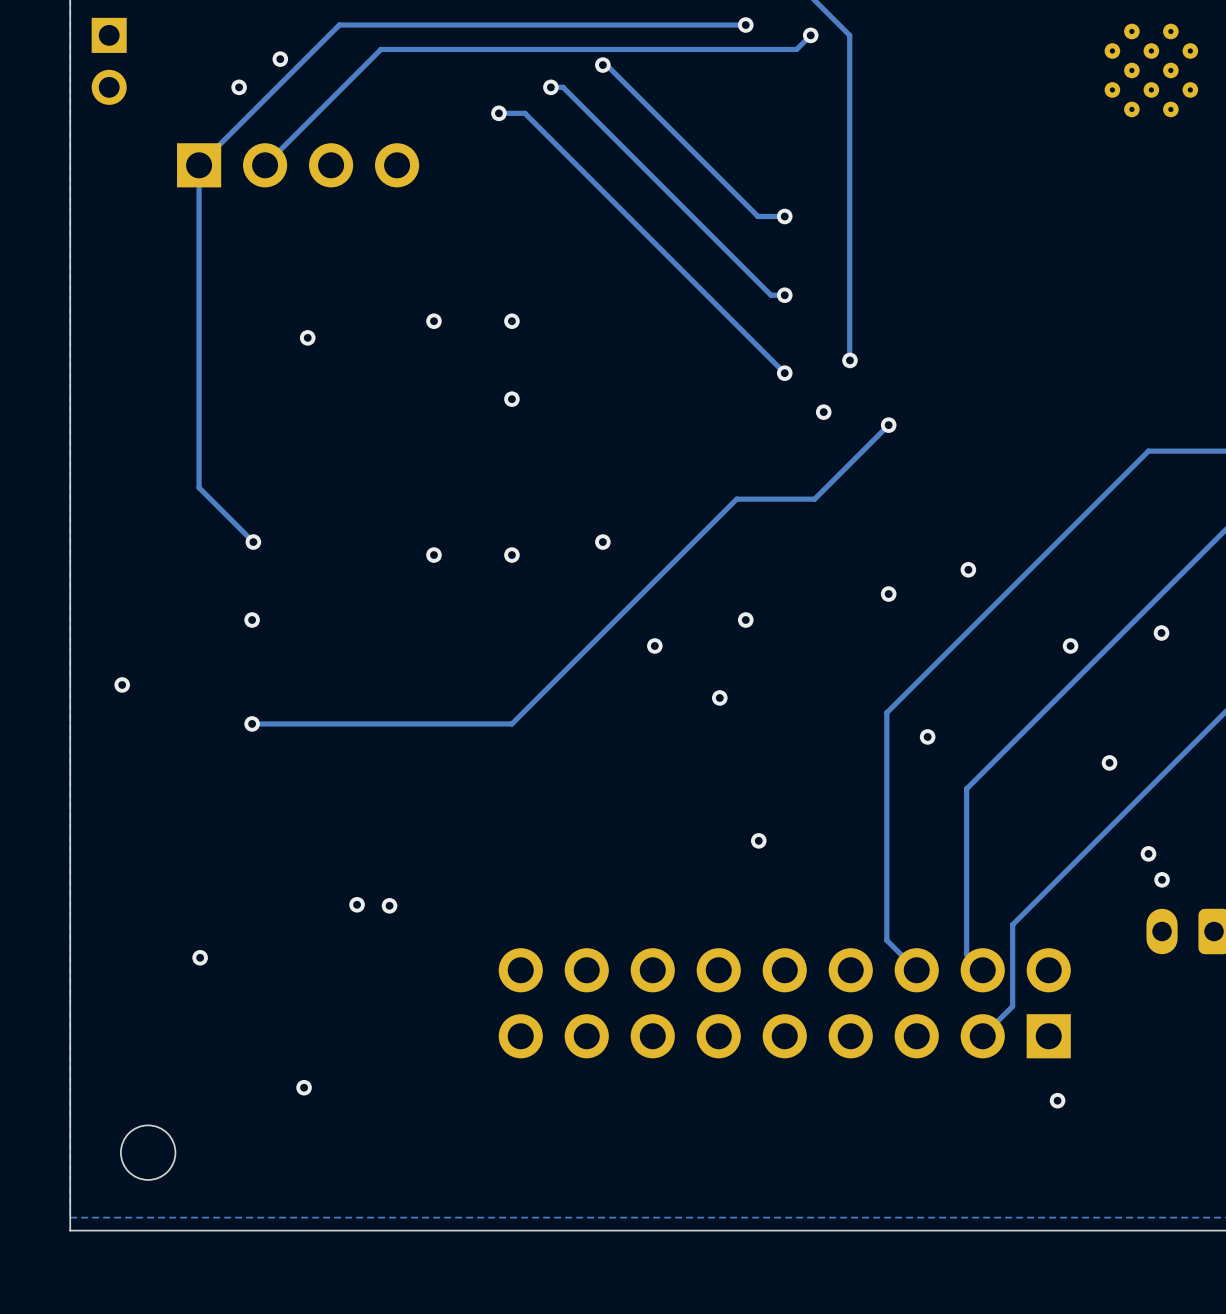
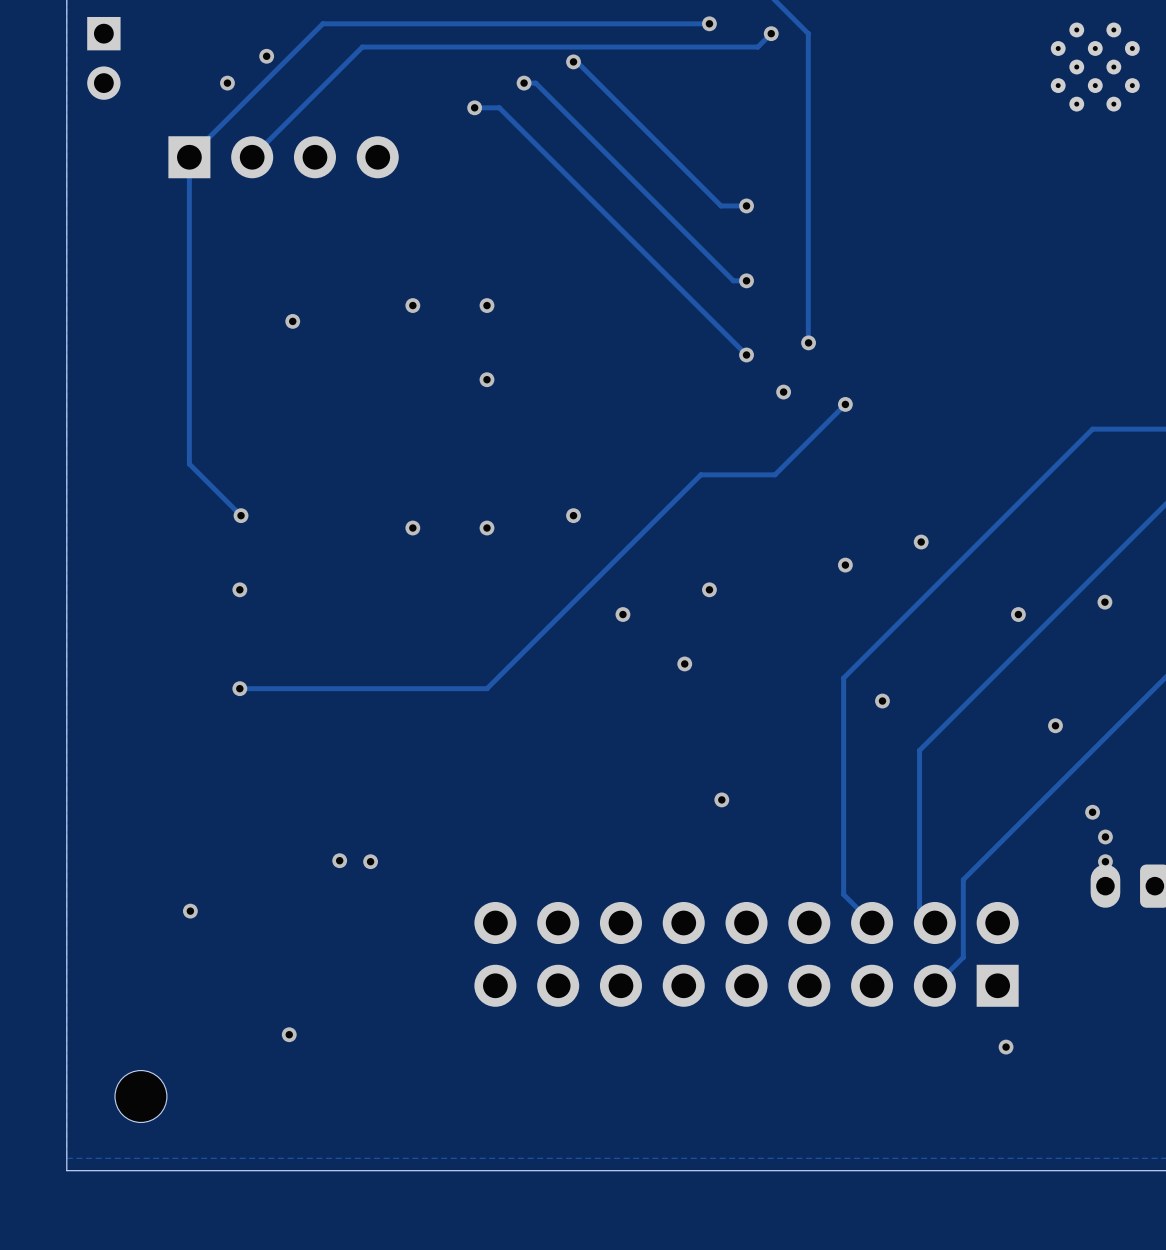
via: (122, 684) -> none
via: none -> (1105, 861)

